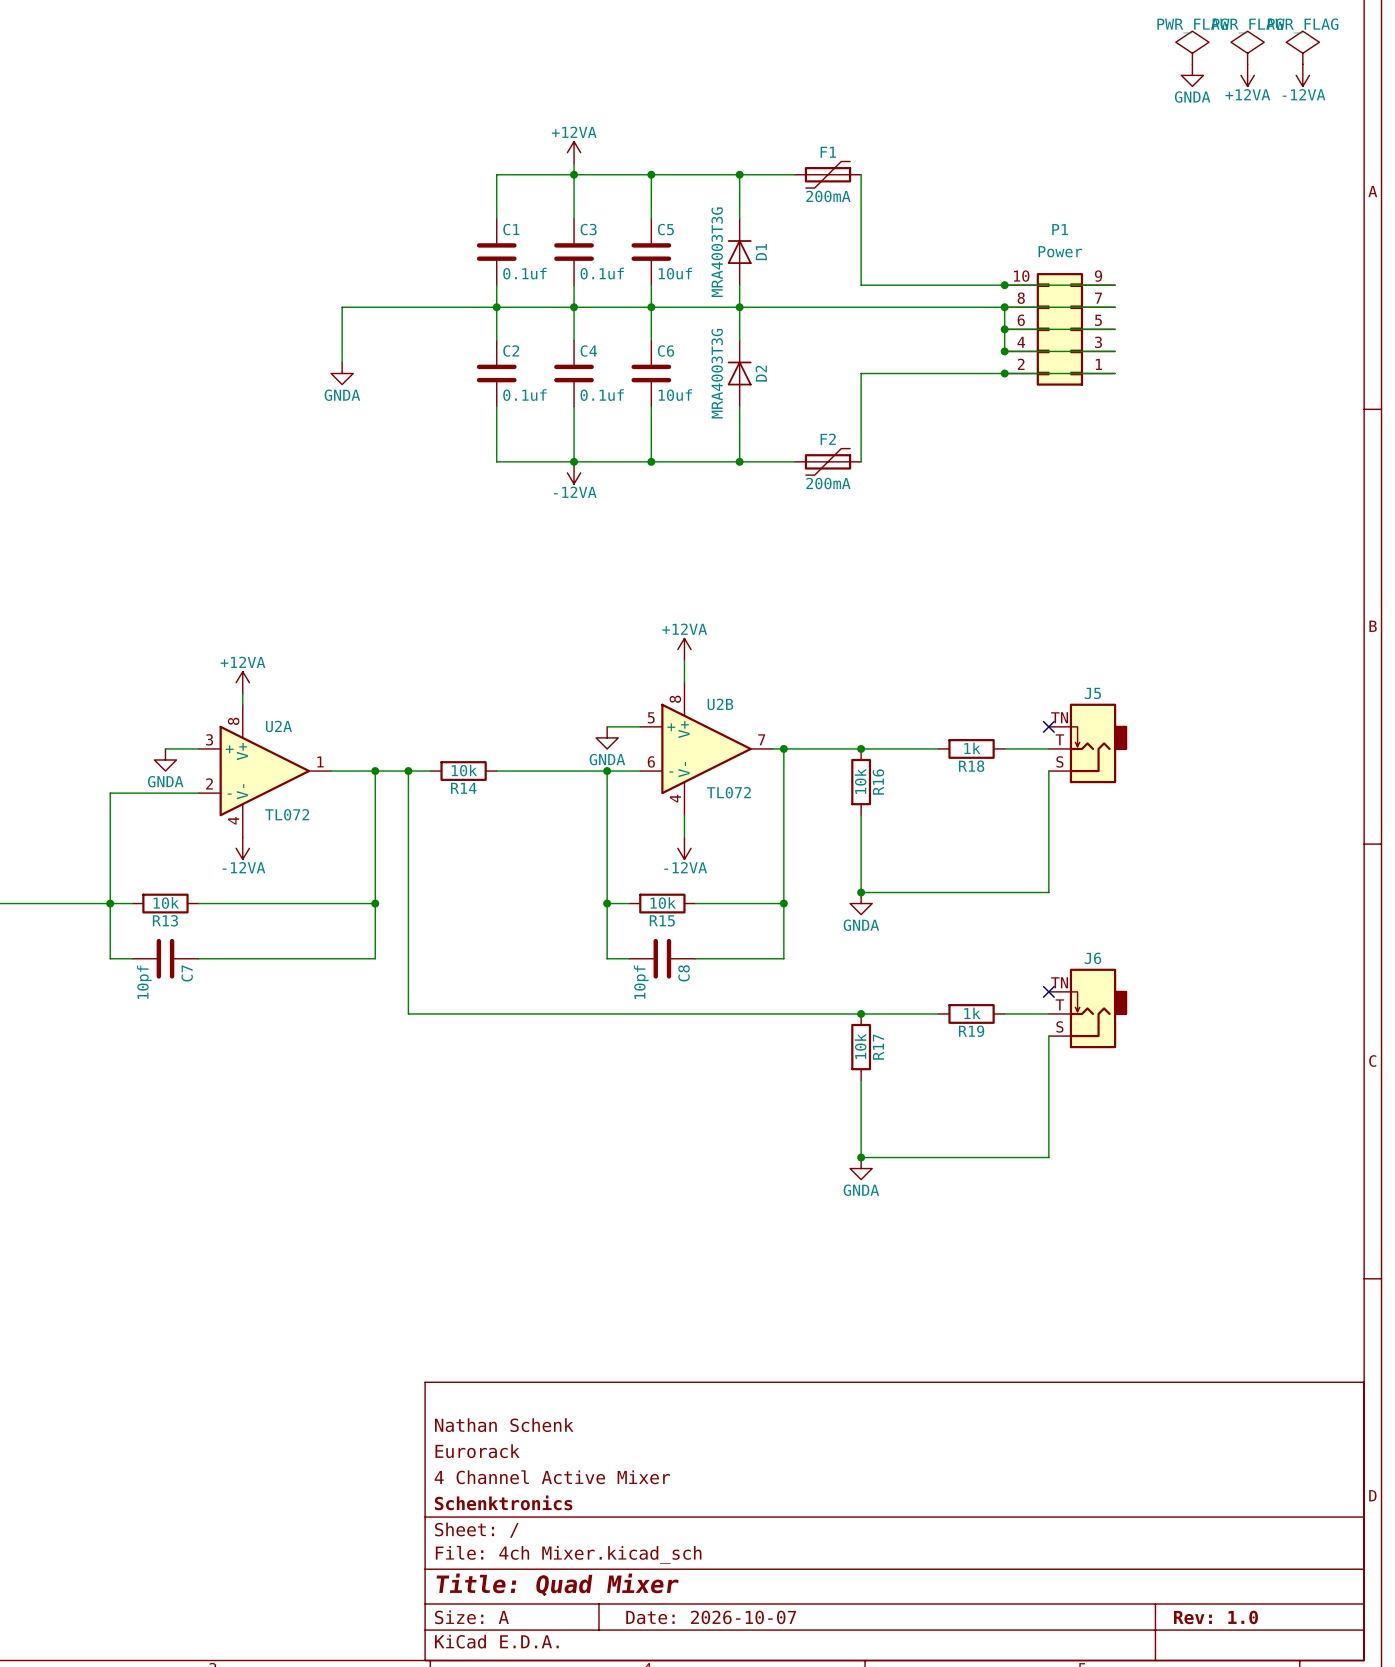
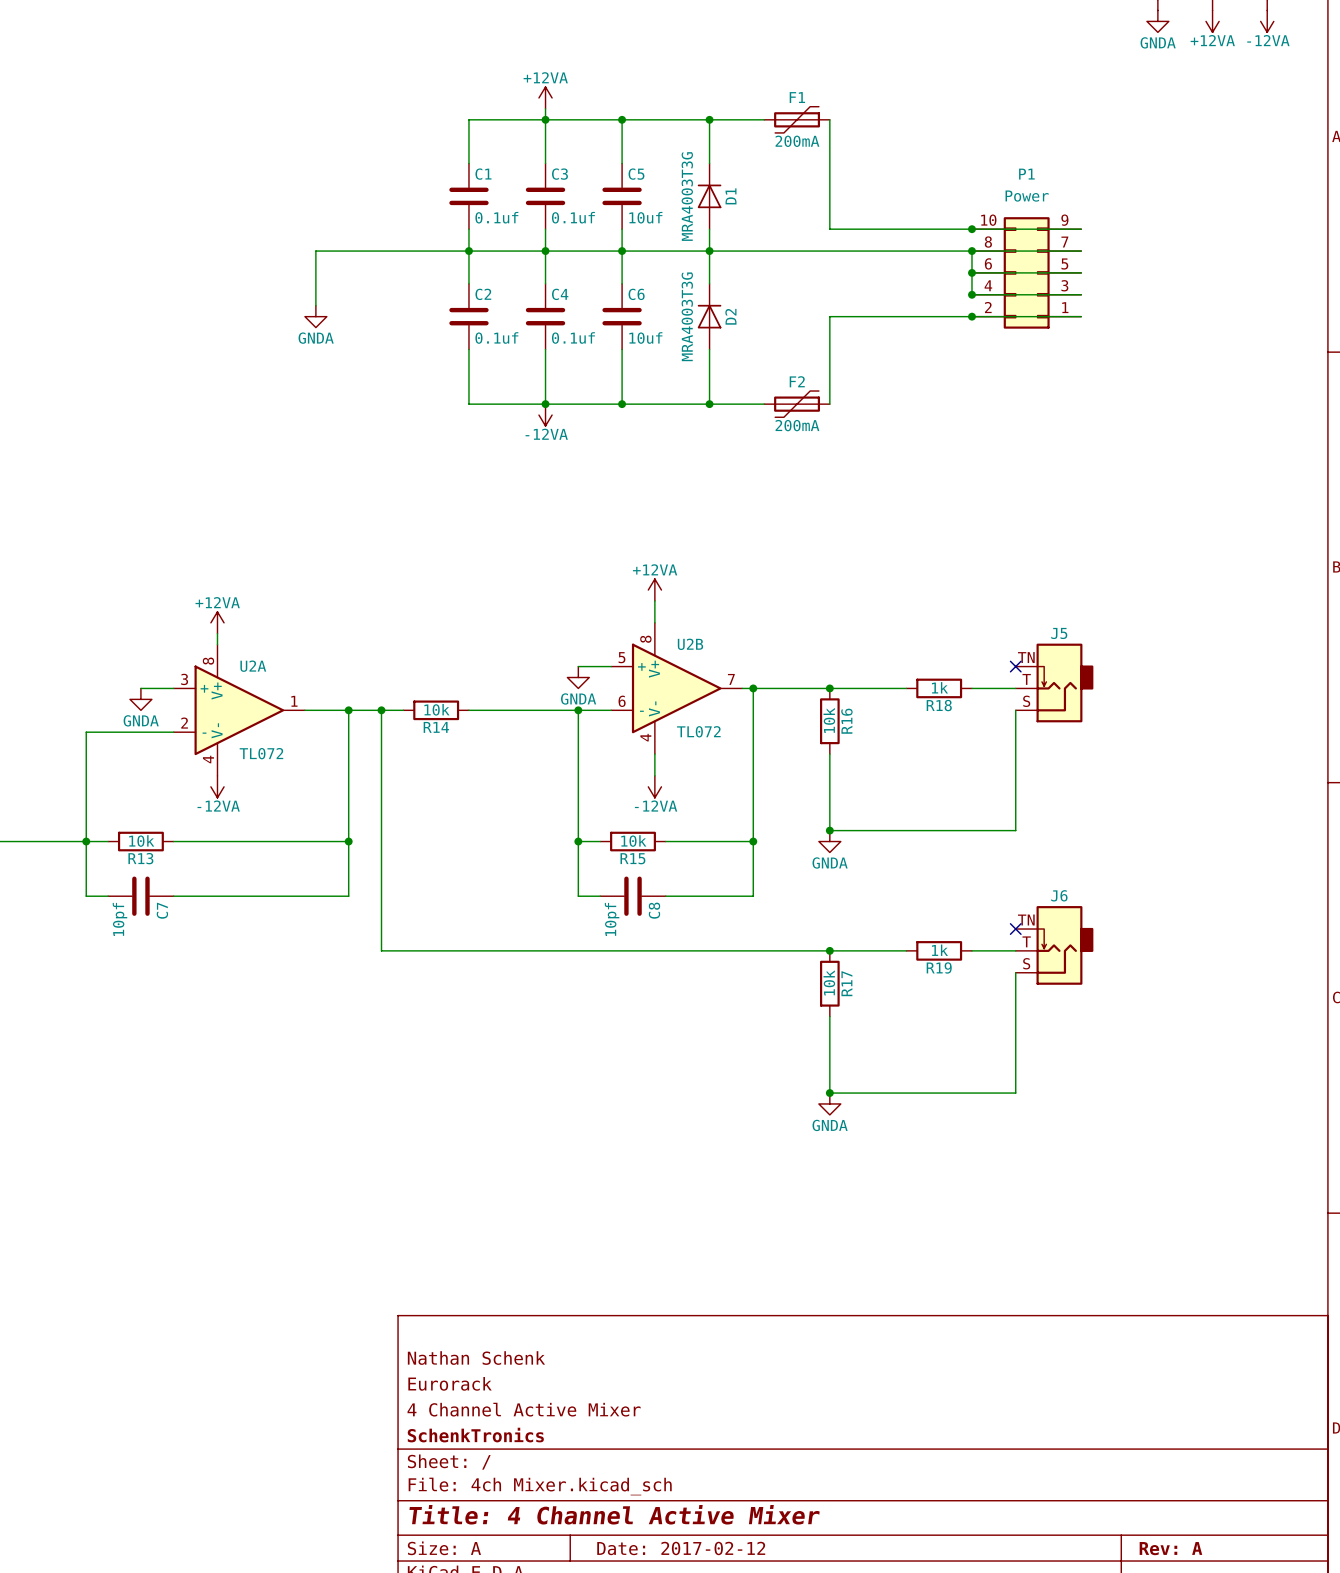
title block: Schenktronics (503, 1502) -> SchenkTronics (475, 1435)
title block: Title: Quad Mixer (557, 1584) -> Title: 4 Channel Active Mixer (614, 1514)
title block: Date: 2026-10-07 (711, 1617) -> Date: 2017-02-12 (681, 1548)
title block: Rev: 1.0 (1215, 1617) -> Rev: A (1170, 1548)

